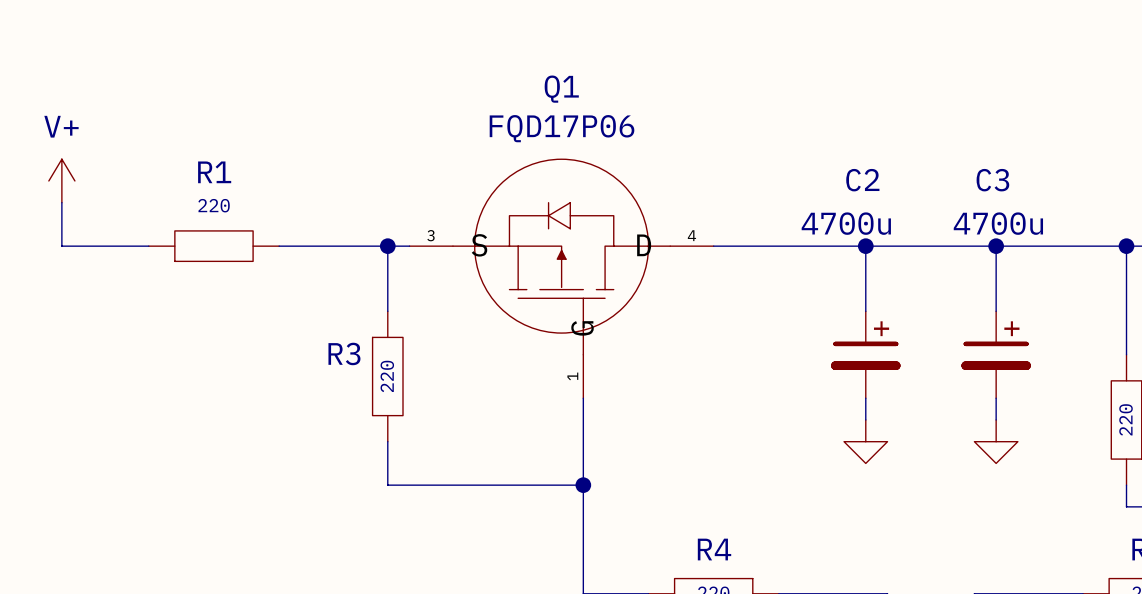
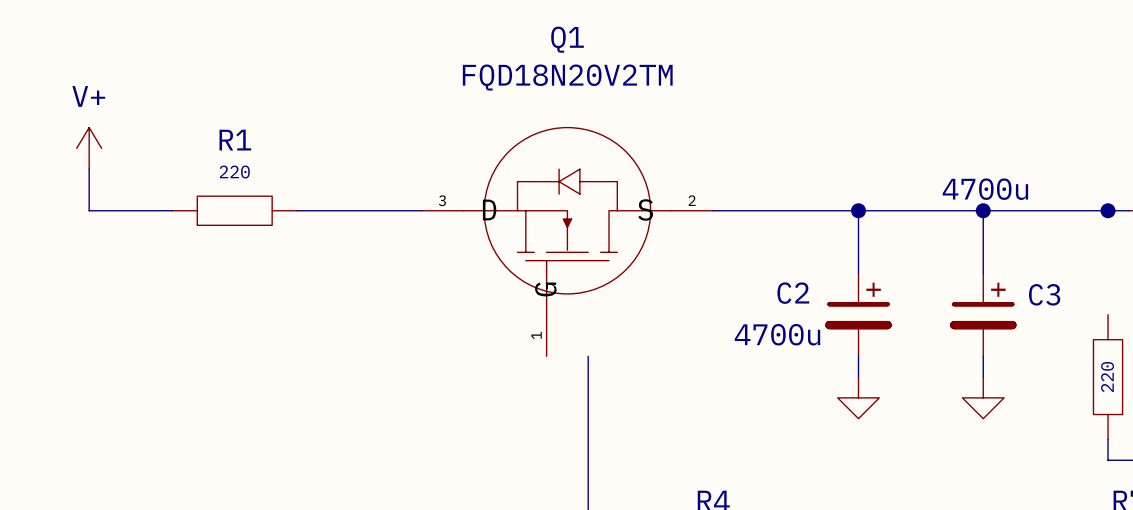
Q1 value: FQD17P06 (562, 128) -> FQD18N20V2TM (567, 77)
Q1 symbol: [409, 159, 714, 399] -> [421, 127, 713, 357]
C2 name position: C2 (862, 180) -> C2 (793, 293)
C3 name position: C3 (992, 180) -> C3 (1044, 294)
C2 value position: 4700u (846, 223) -> 4700u (777, 334)
wire: (387, 246) (387, 311) -> none
junction: (387, 246) -> none
wire: (1126, 246) (1126, 354) -> none
R3: 220 (387, 376) -> none
wire: (387, 441) (387, 485) (583, 485) -> none
junction: (583, 485) -> none

